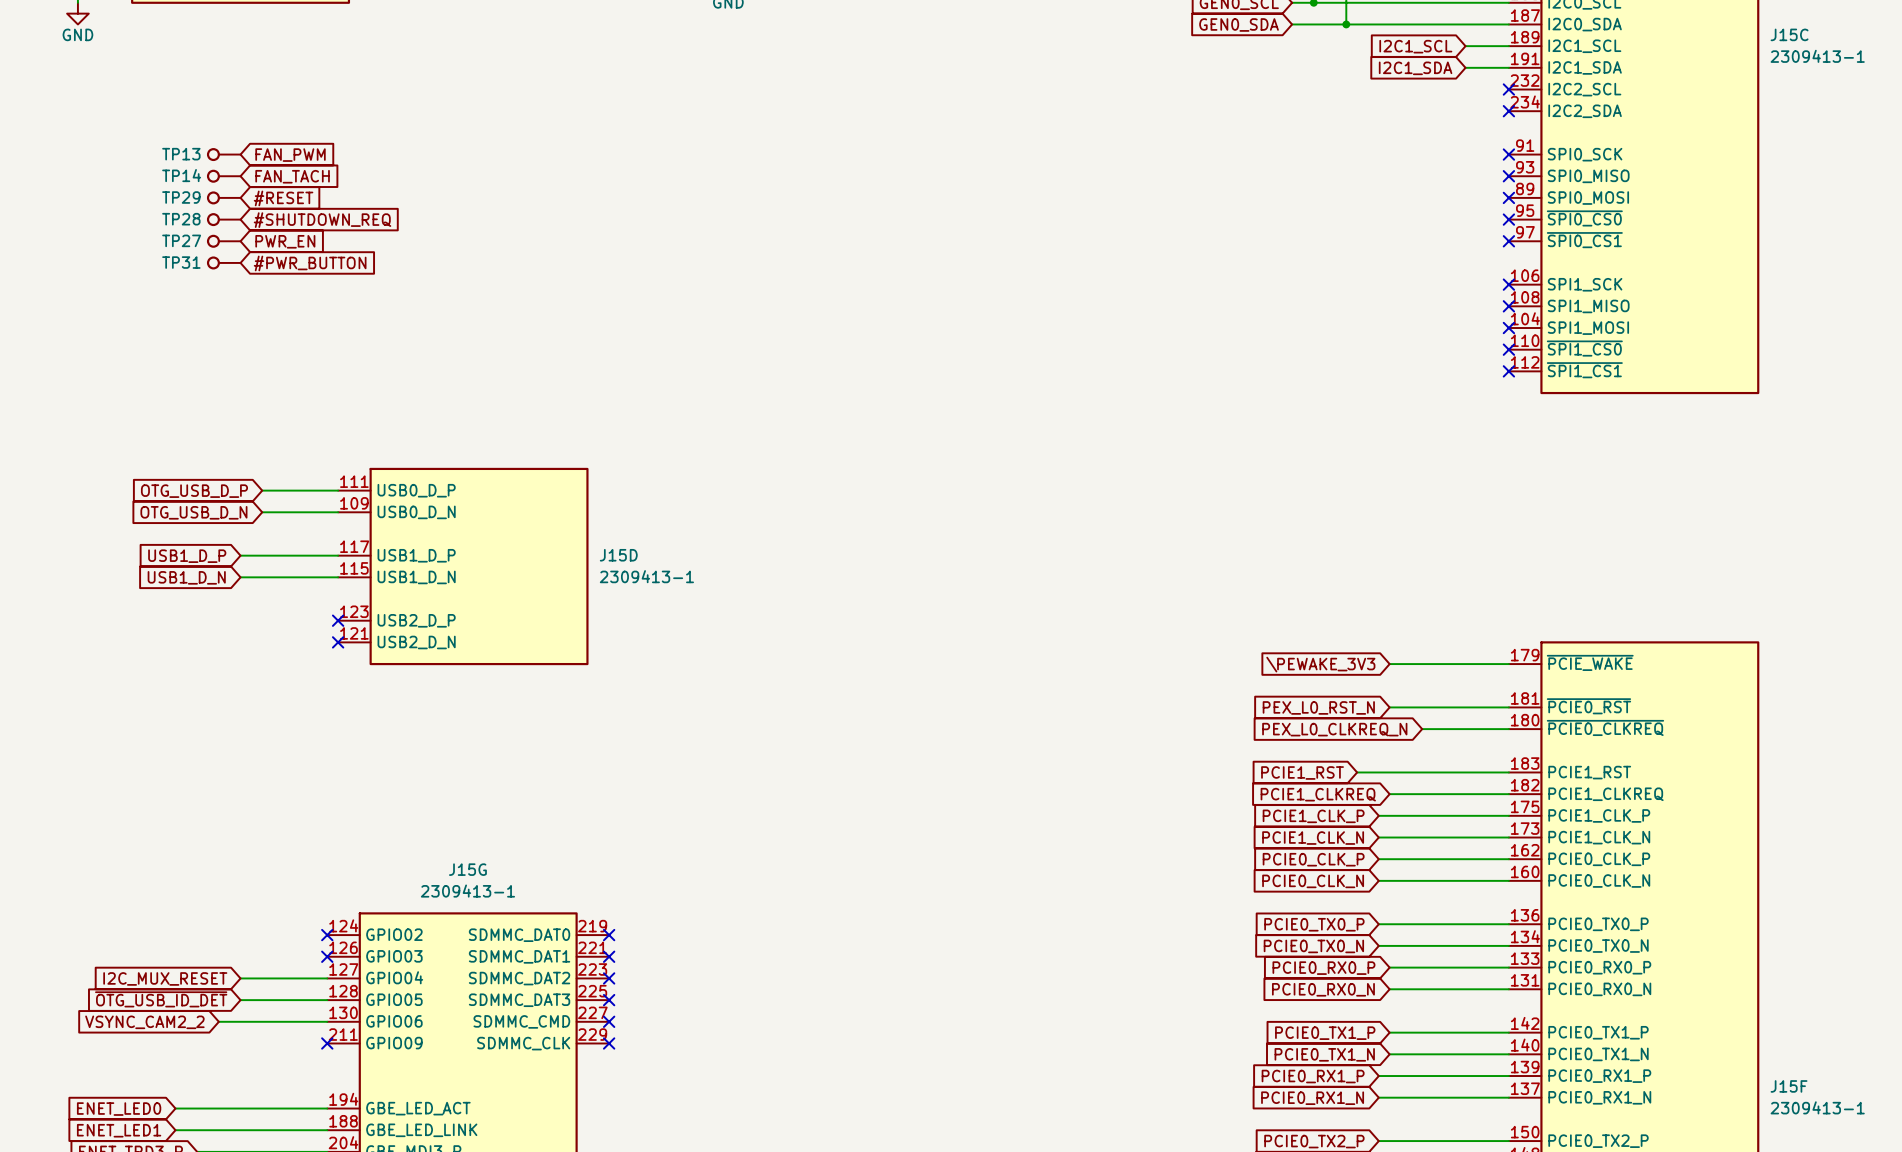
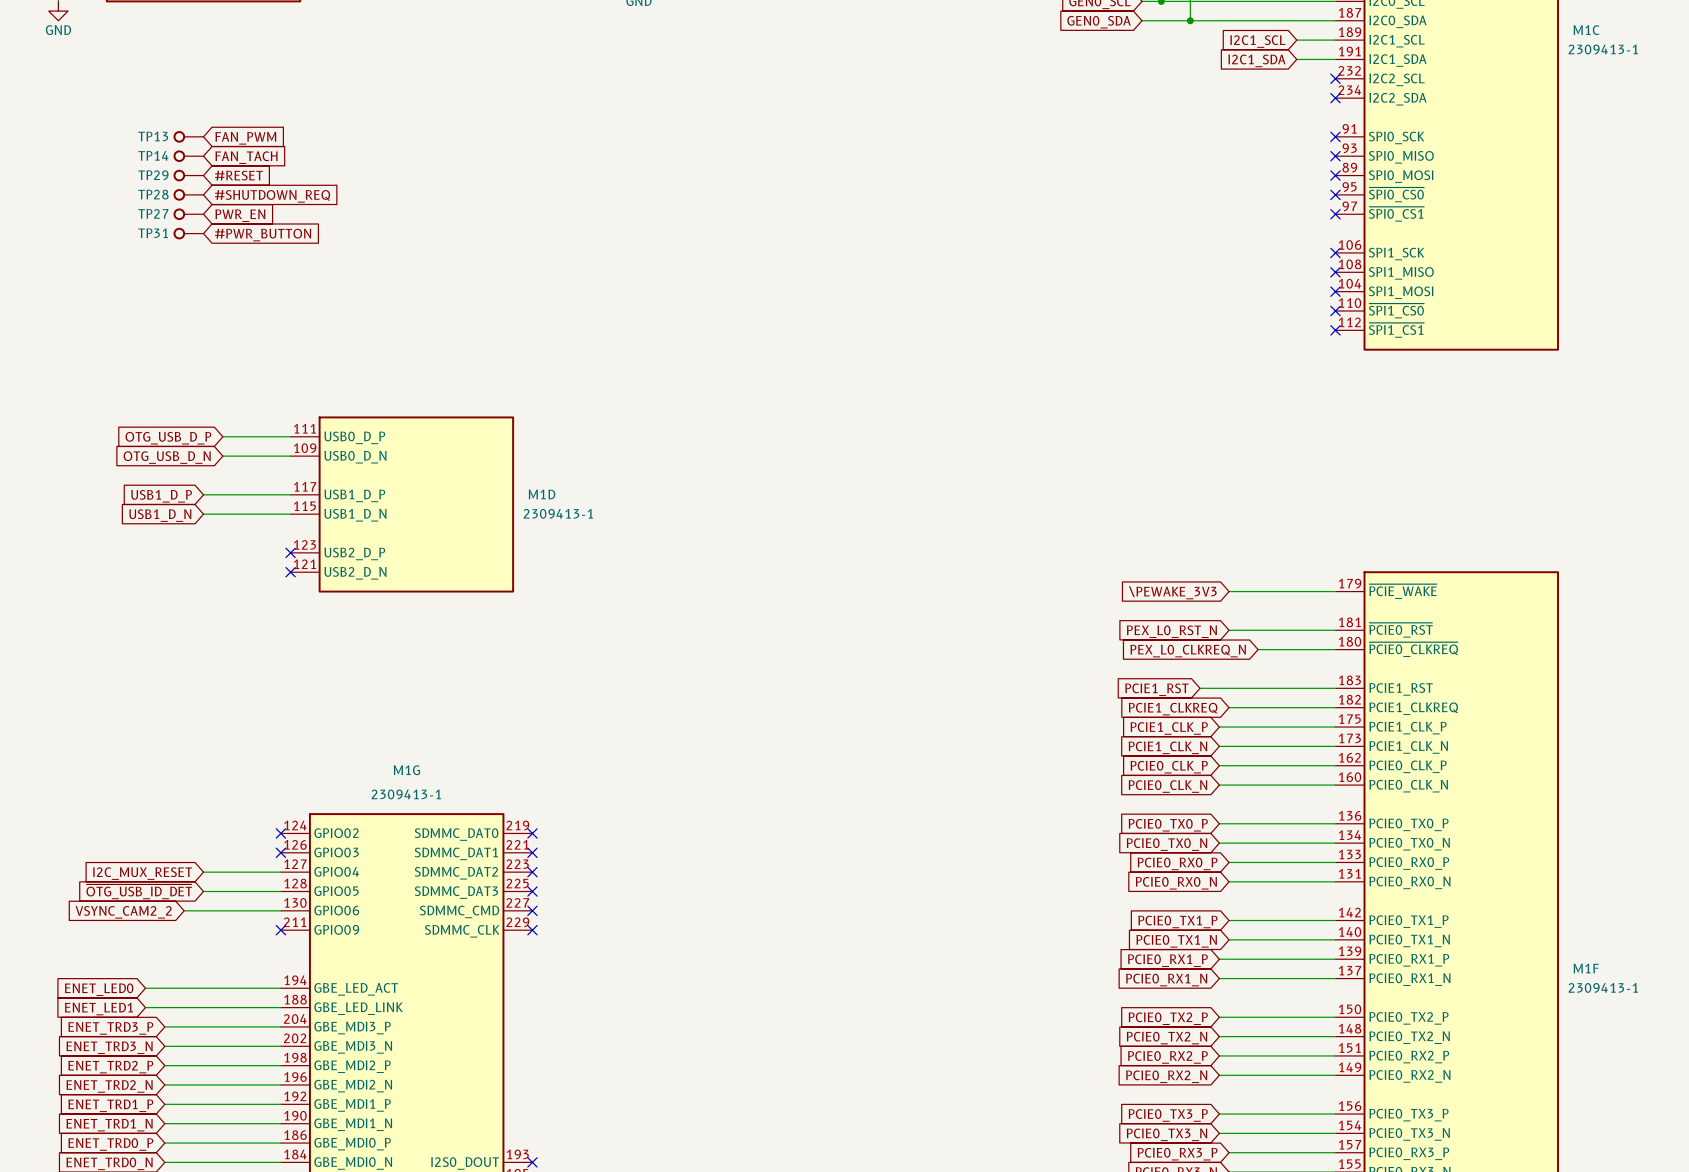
J15C name: J15C (1789, 34) -> M1C (1586, 30)
J15D name: J15D (618, 555) -> M1D (541, 494)
J15G name: J15G (467, 869) -> M1G (406, 770)
J15F name: J15F (1789, 1086) -> M1F (1586, 968)

